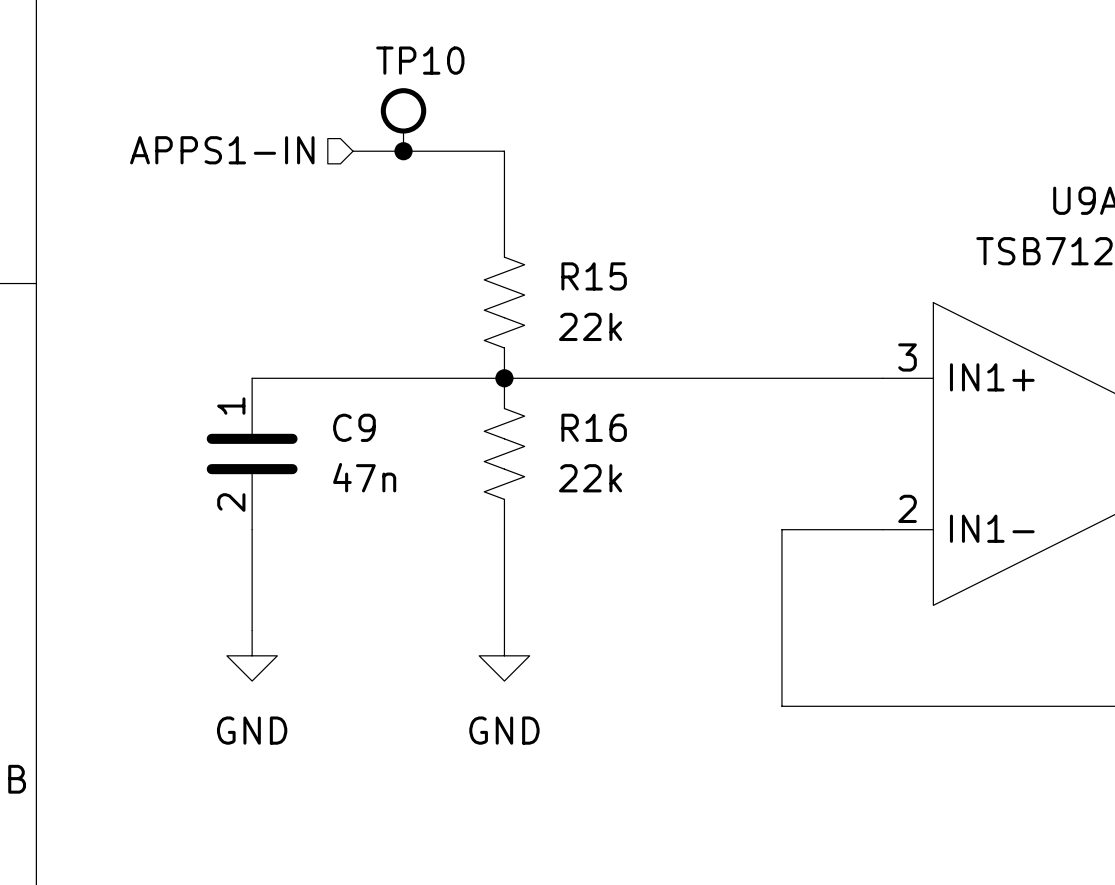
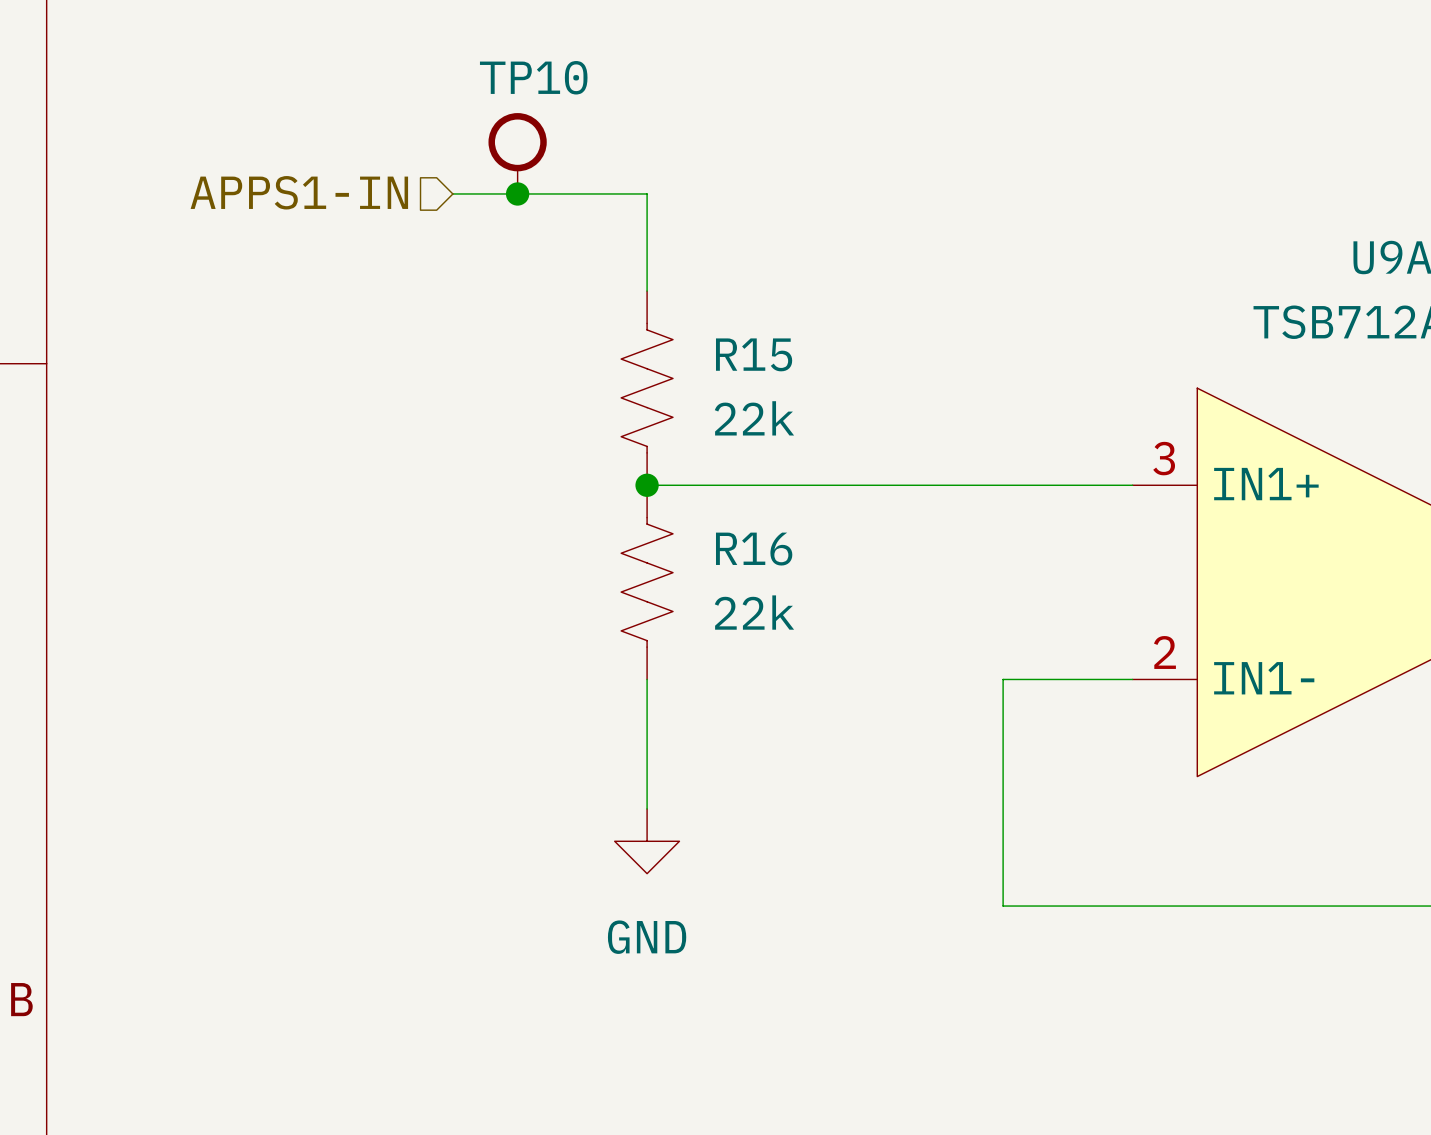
wire: (252, 378) (504, 378) -> none
C9: 47n (252, 453) -> none
wire: (252, 529) (252, 630) -> none
power symbol: GND (252, 655) -> none

